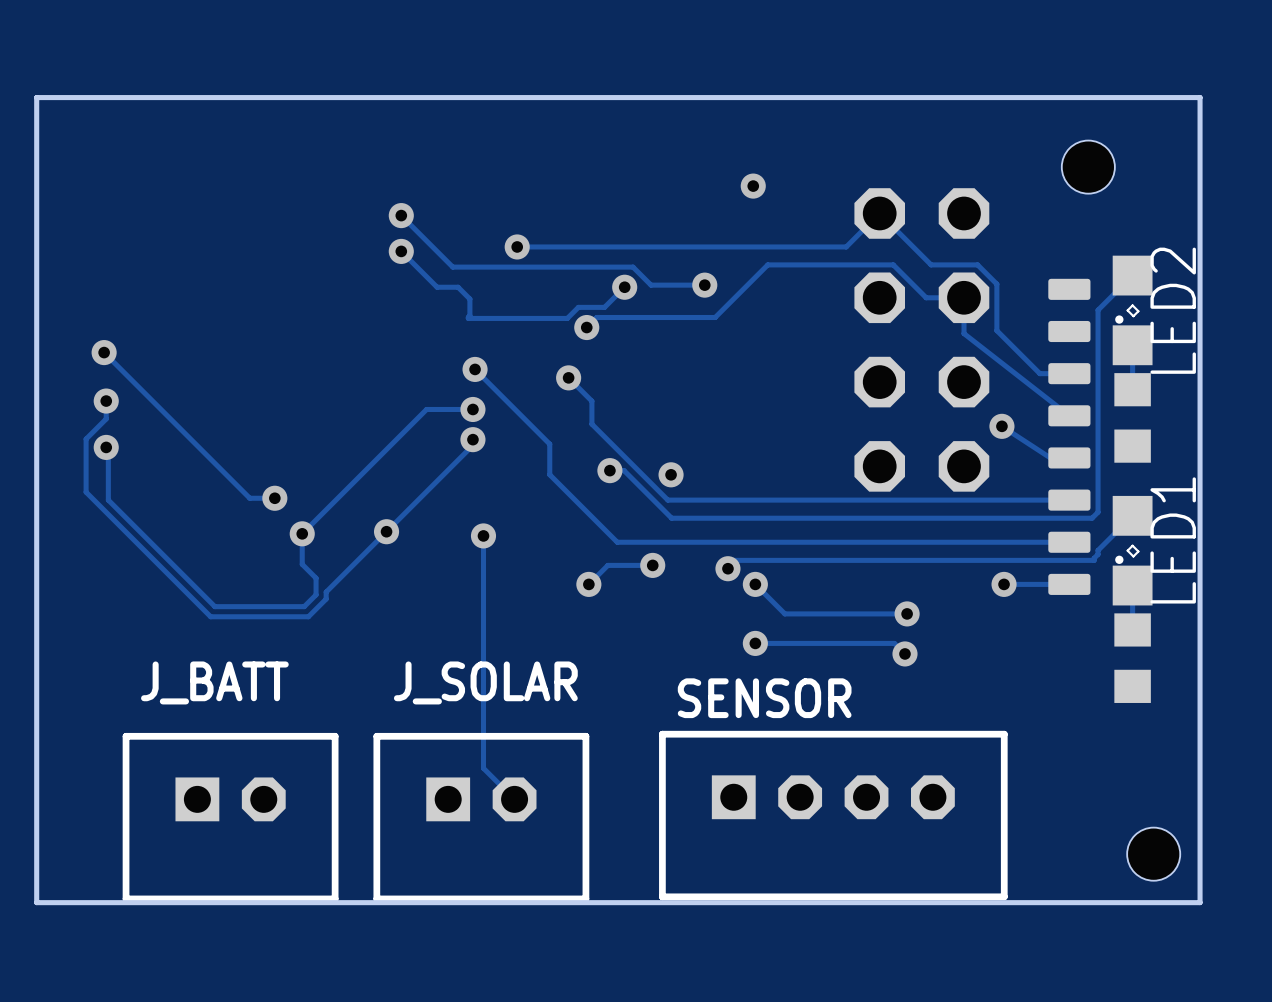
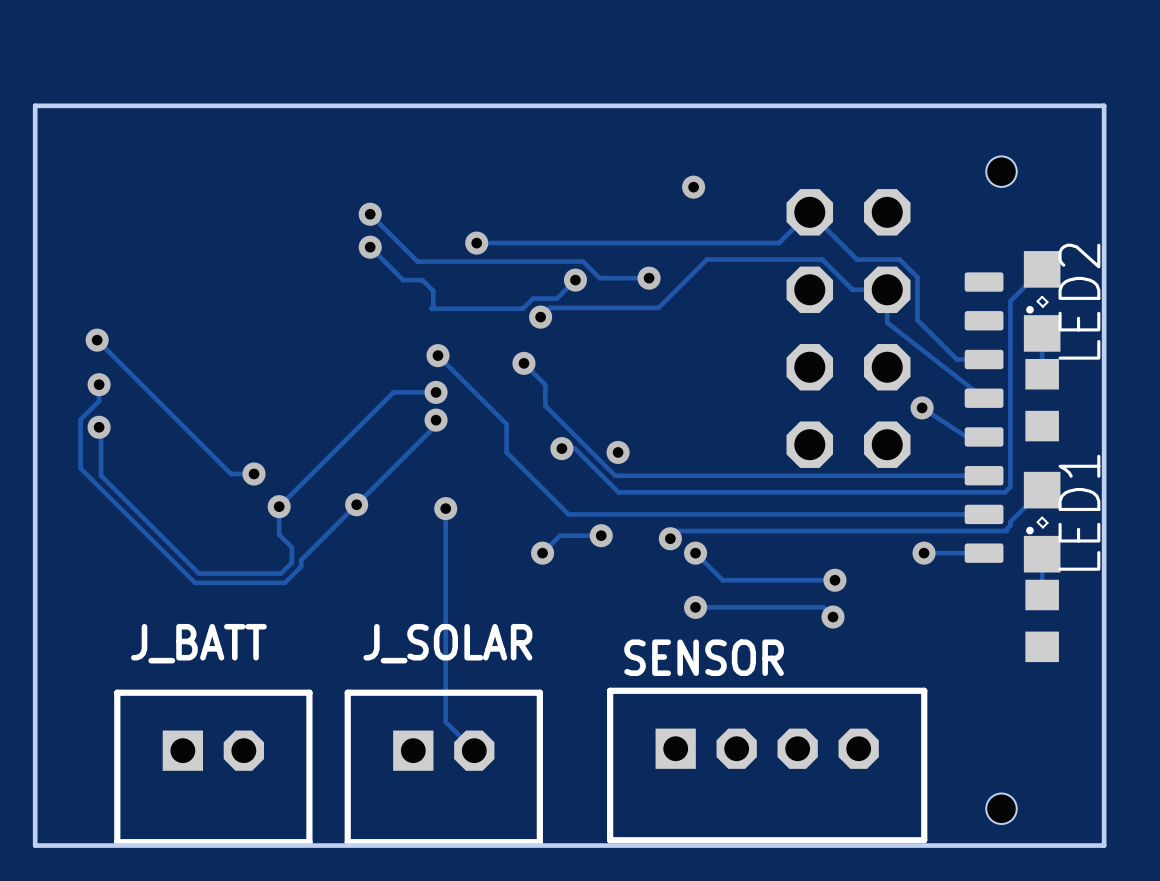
hole size: [1061, 140, 1115, 194] -> [986, 156, 1017, 187]
hole: (1153, 854) -> none
hole: none -> (1001, 808)

